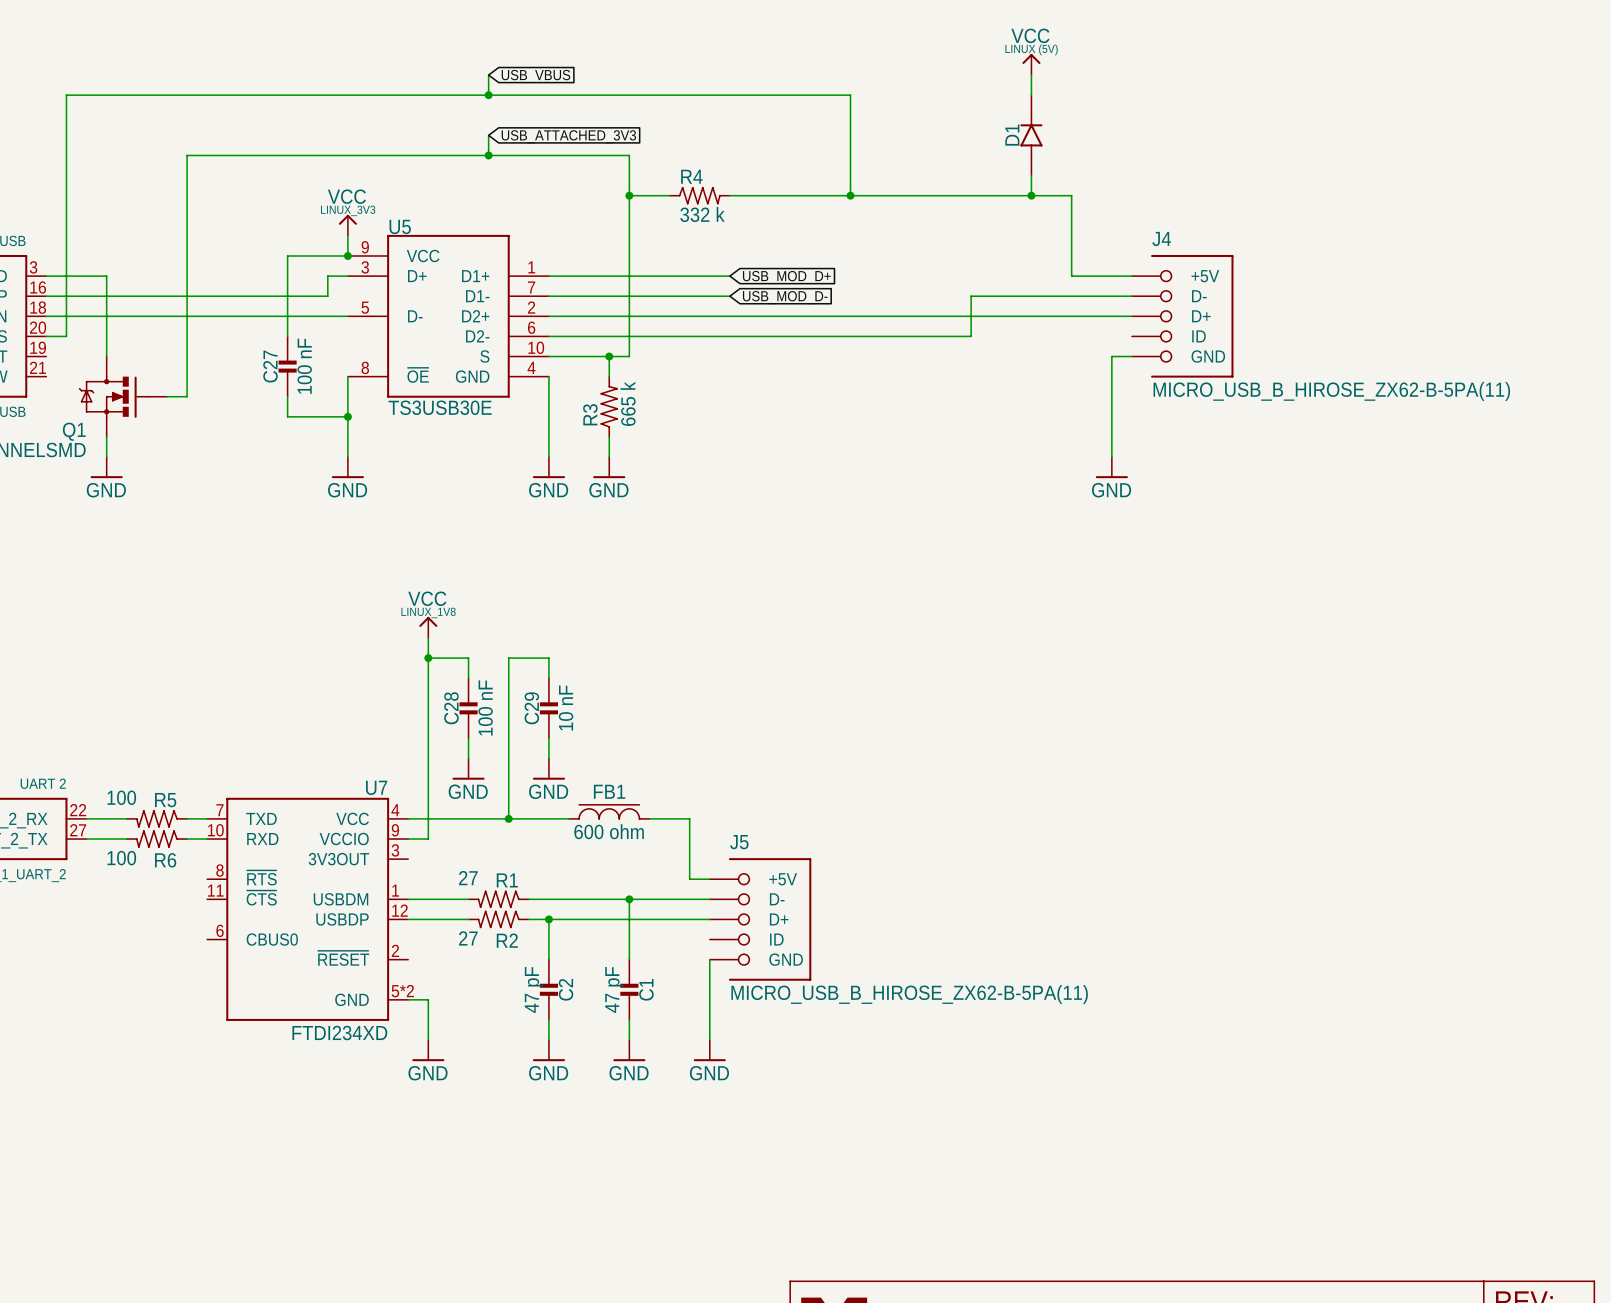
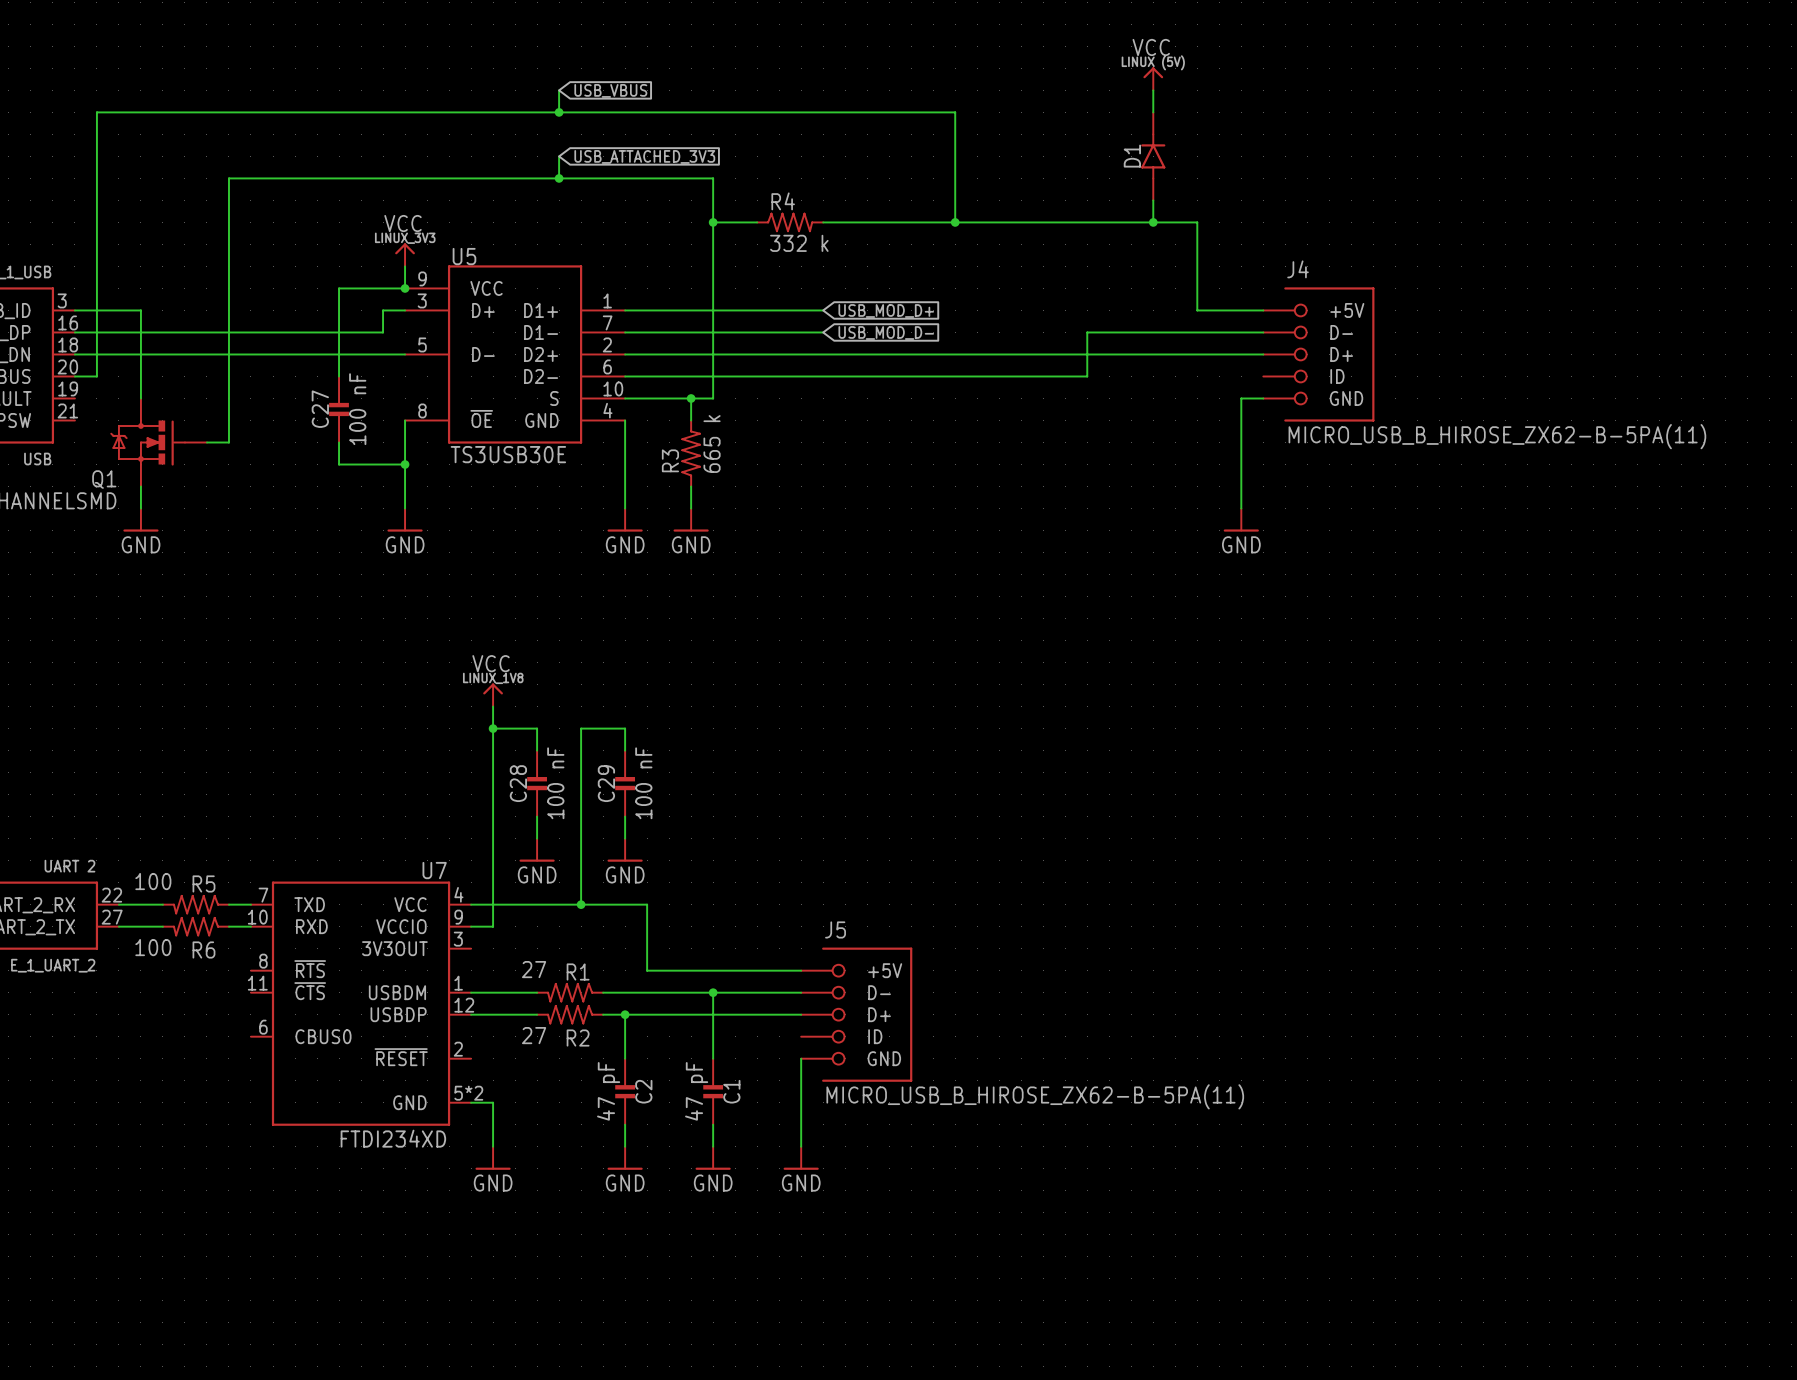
C29 value: 10 nF (566, 708) -> 100 nF (643, 783)
FB1: 600 ohm (609, 811) -> none
wire: (649, 818) (689, 818) (689, 879) -> (647, 904) (647, 970) (779, 970)

